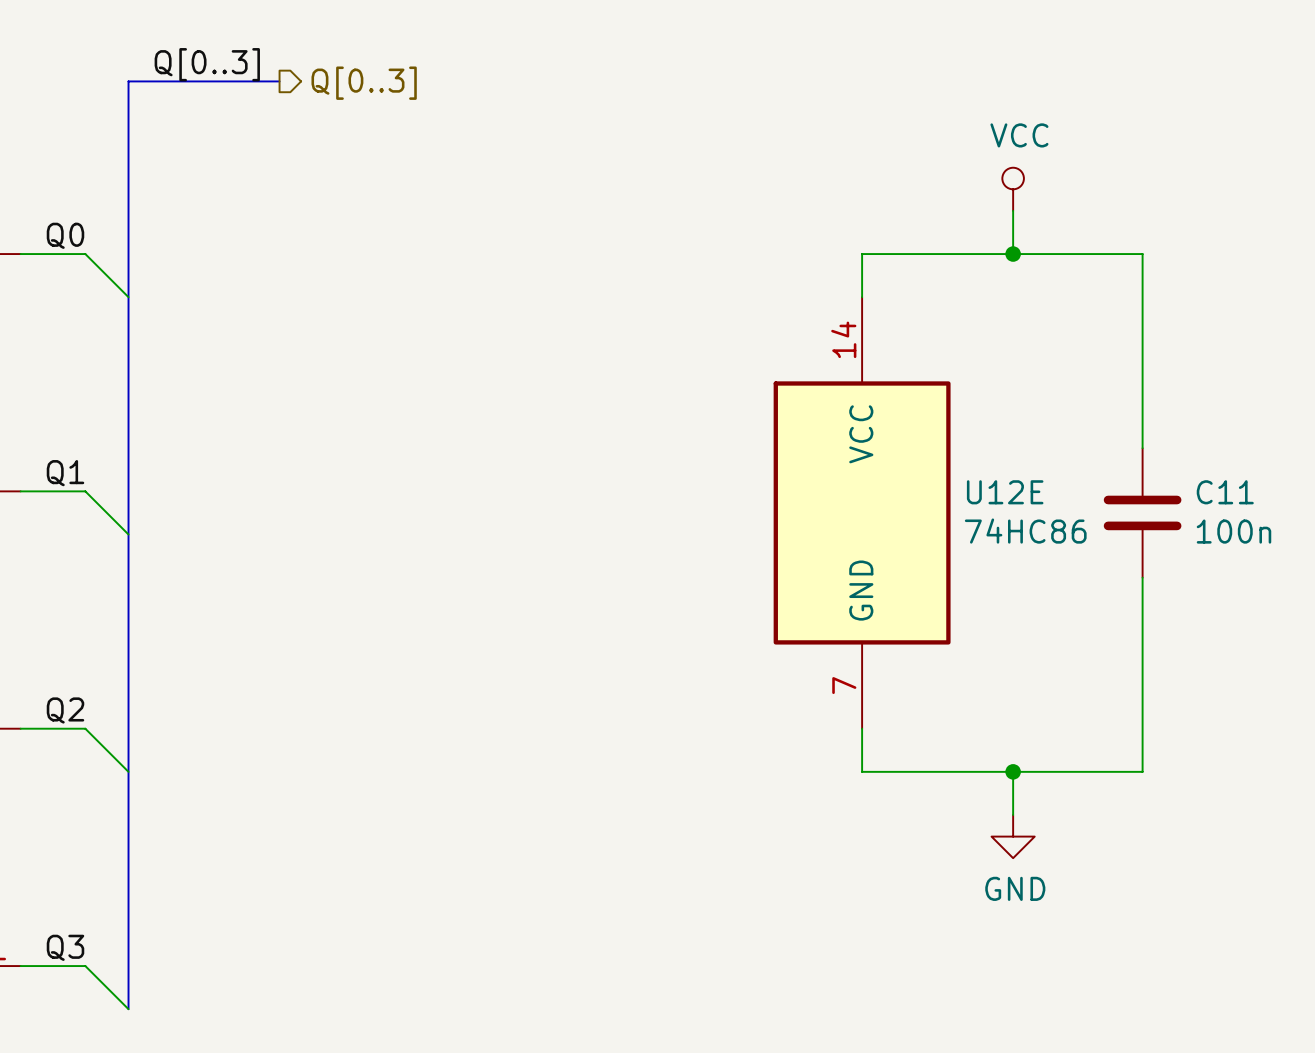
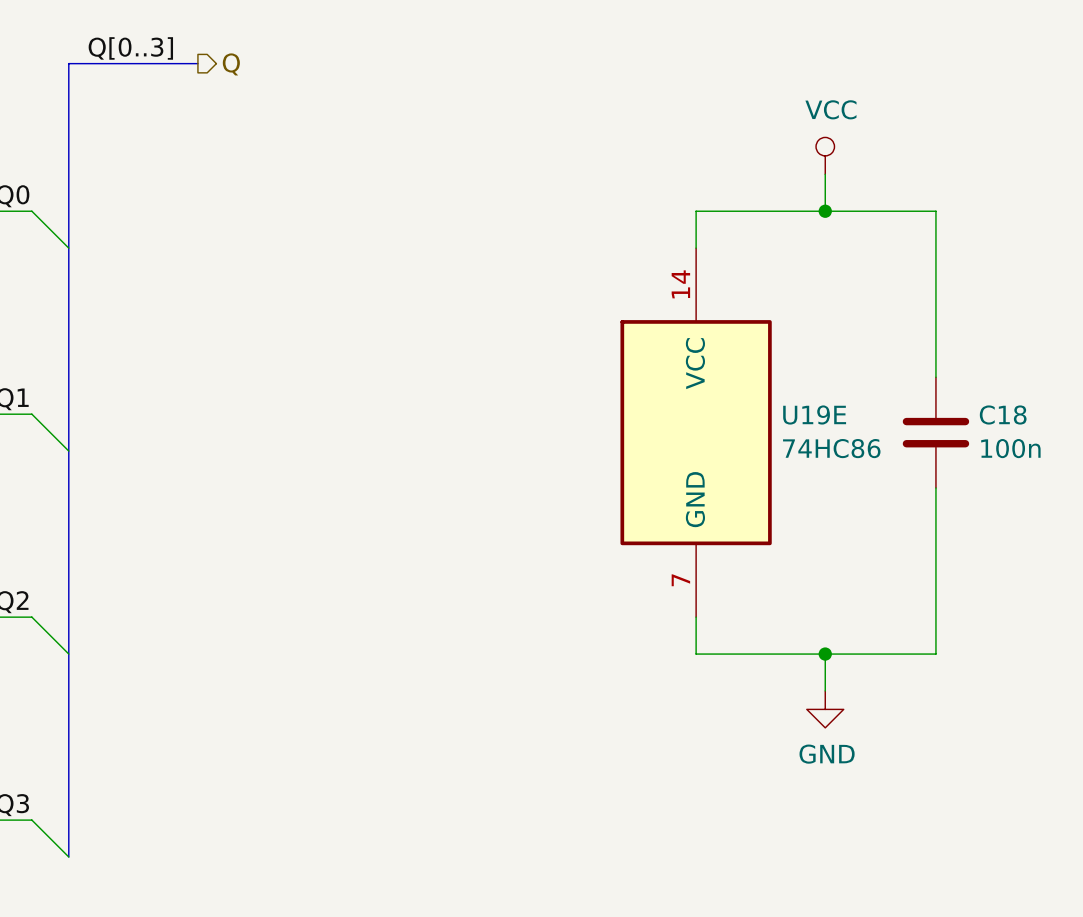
hierarchical label: Q[0..3] (364, 83) -> Q (231, 64)
U12E name: U12E (1005, 492) -> U19E (814, 414)
C11 name: C11 (1225, 492) -> C18 (1003, 414)

